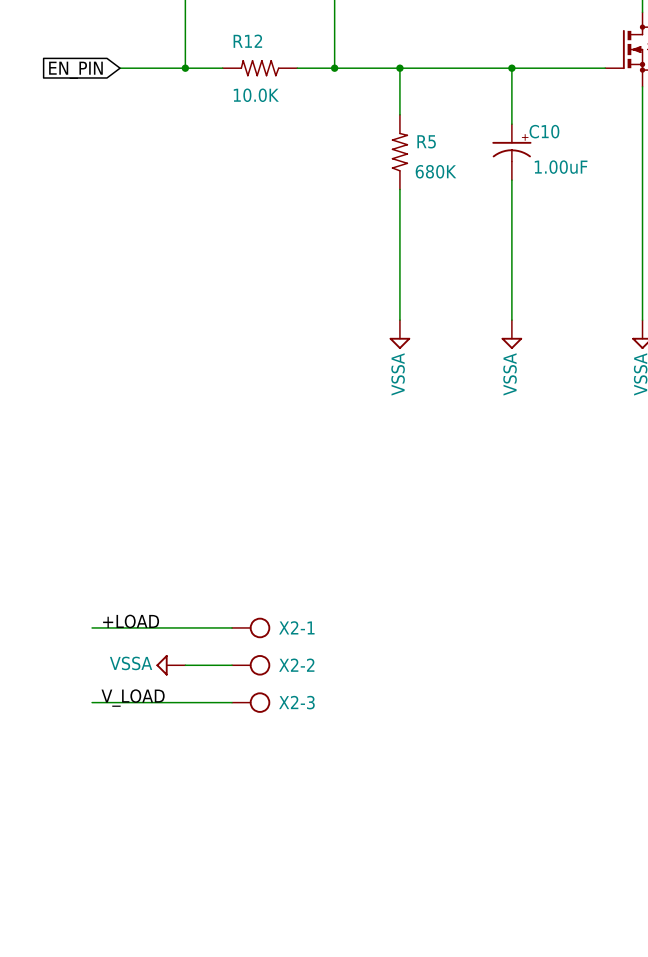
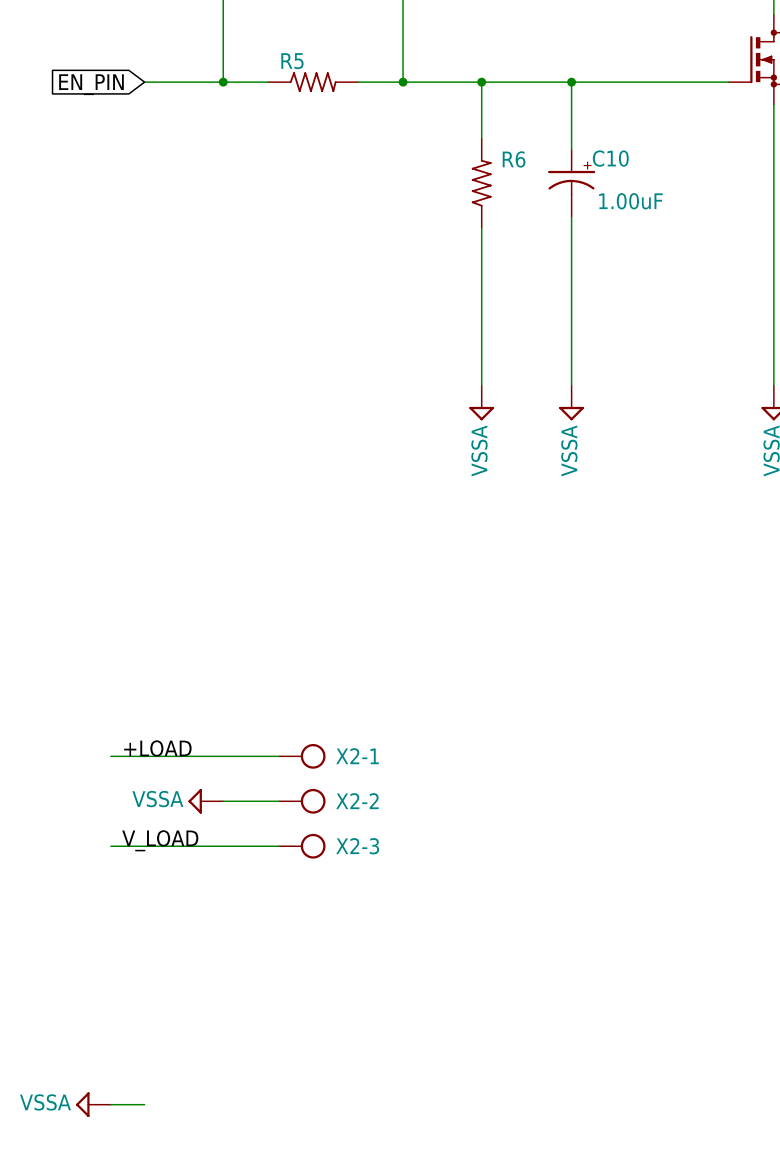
R12: 10.0K (260, 68) -> none
R5: none -> (313, 82)
wire: (511, 68) (511, 124) -> (571, 82) (571, 149)
junction position: (511, 68) -> (571, 82)
R5 name: R5 (426, 141) -> R6 (514, 159)
C10 position: (511, 152) -> (571, 183)
R5 value: 680K (435, 171) -> none
wire: (511, 180) (511, 320) -> (571, 216) (571, 385)
power symbol position: VSSA (511, 334) -> VSSA (571, 402)
power symbol: none -> VSSA (93, 1104)
wire: none -> (110, 1104) (144, 1104)

